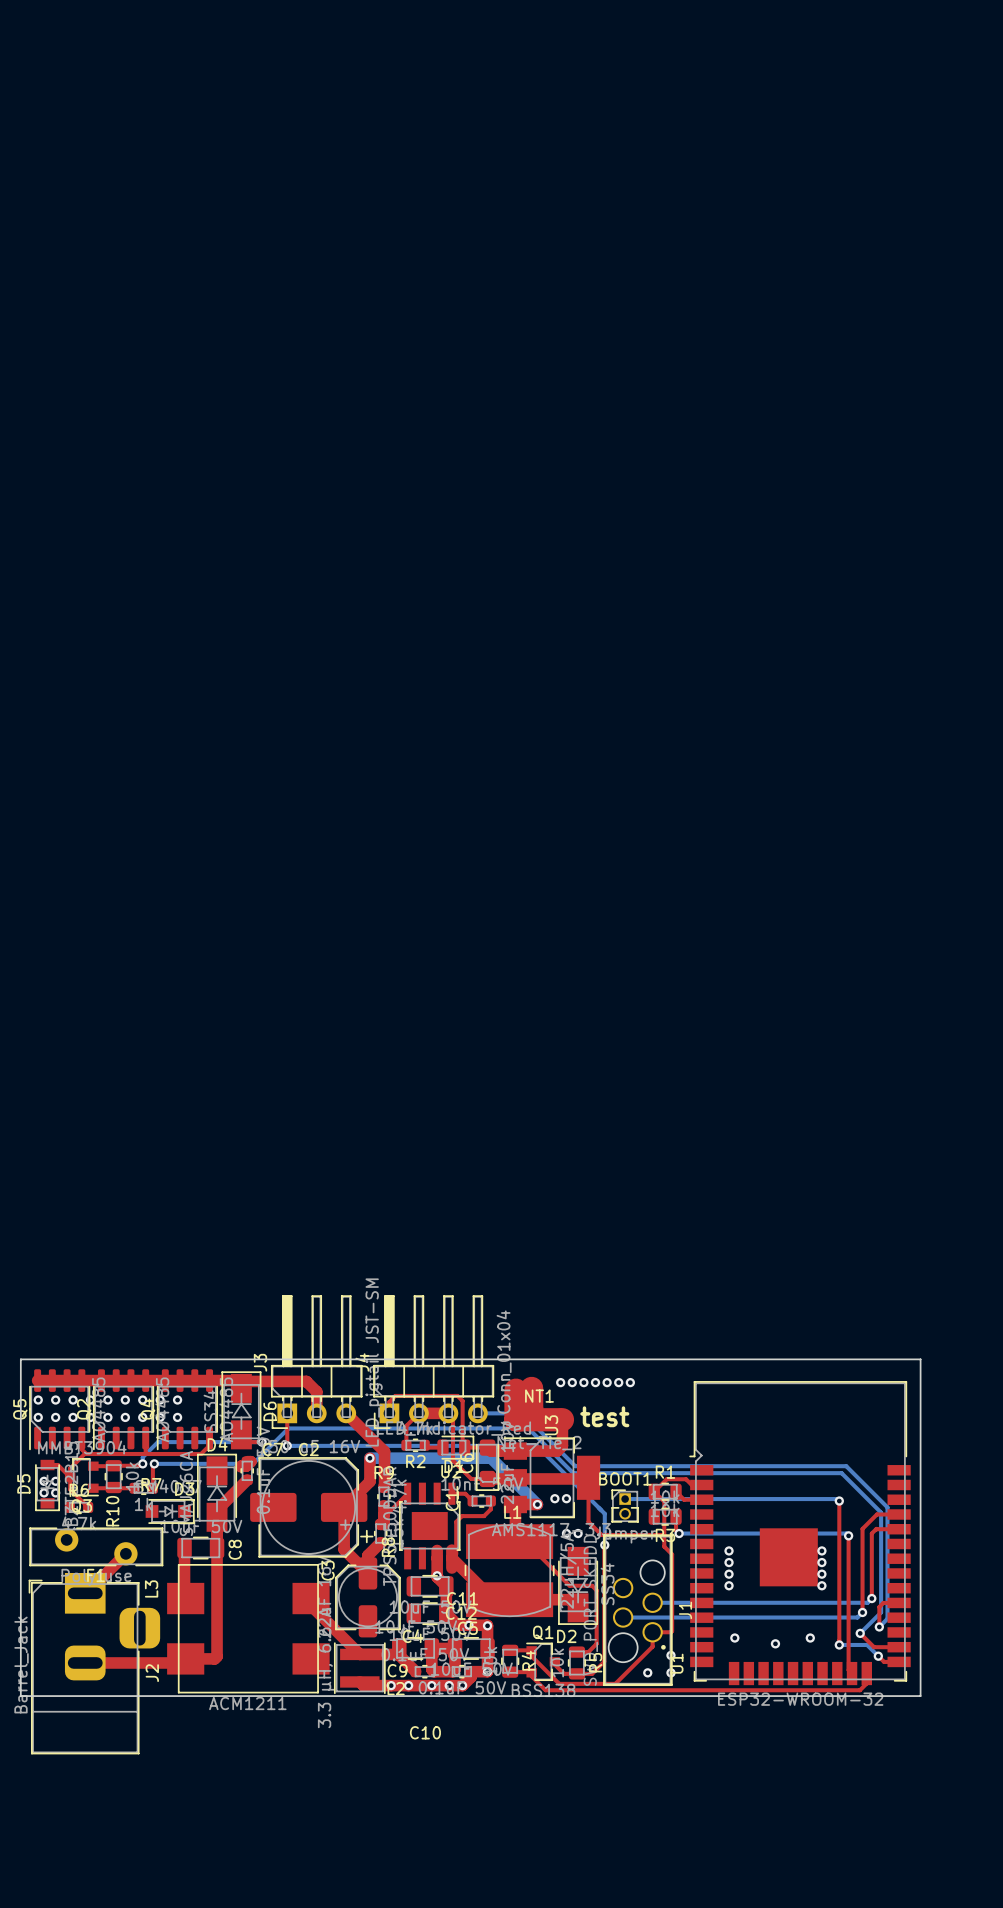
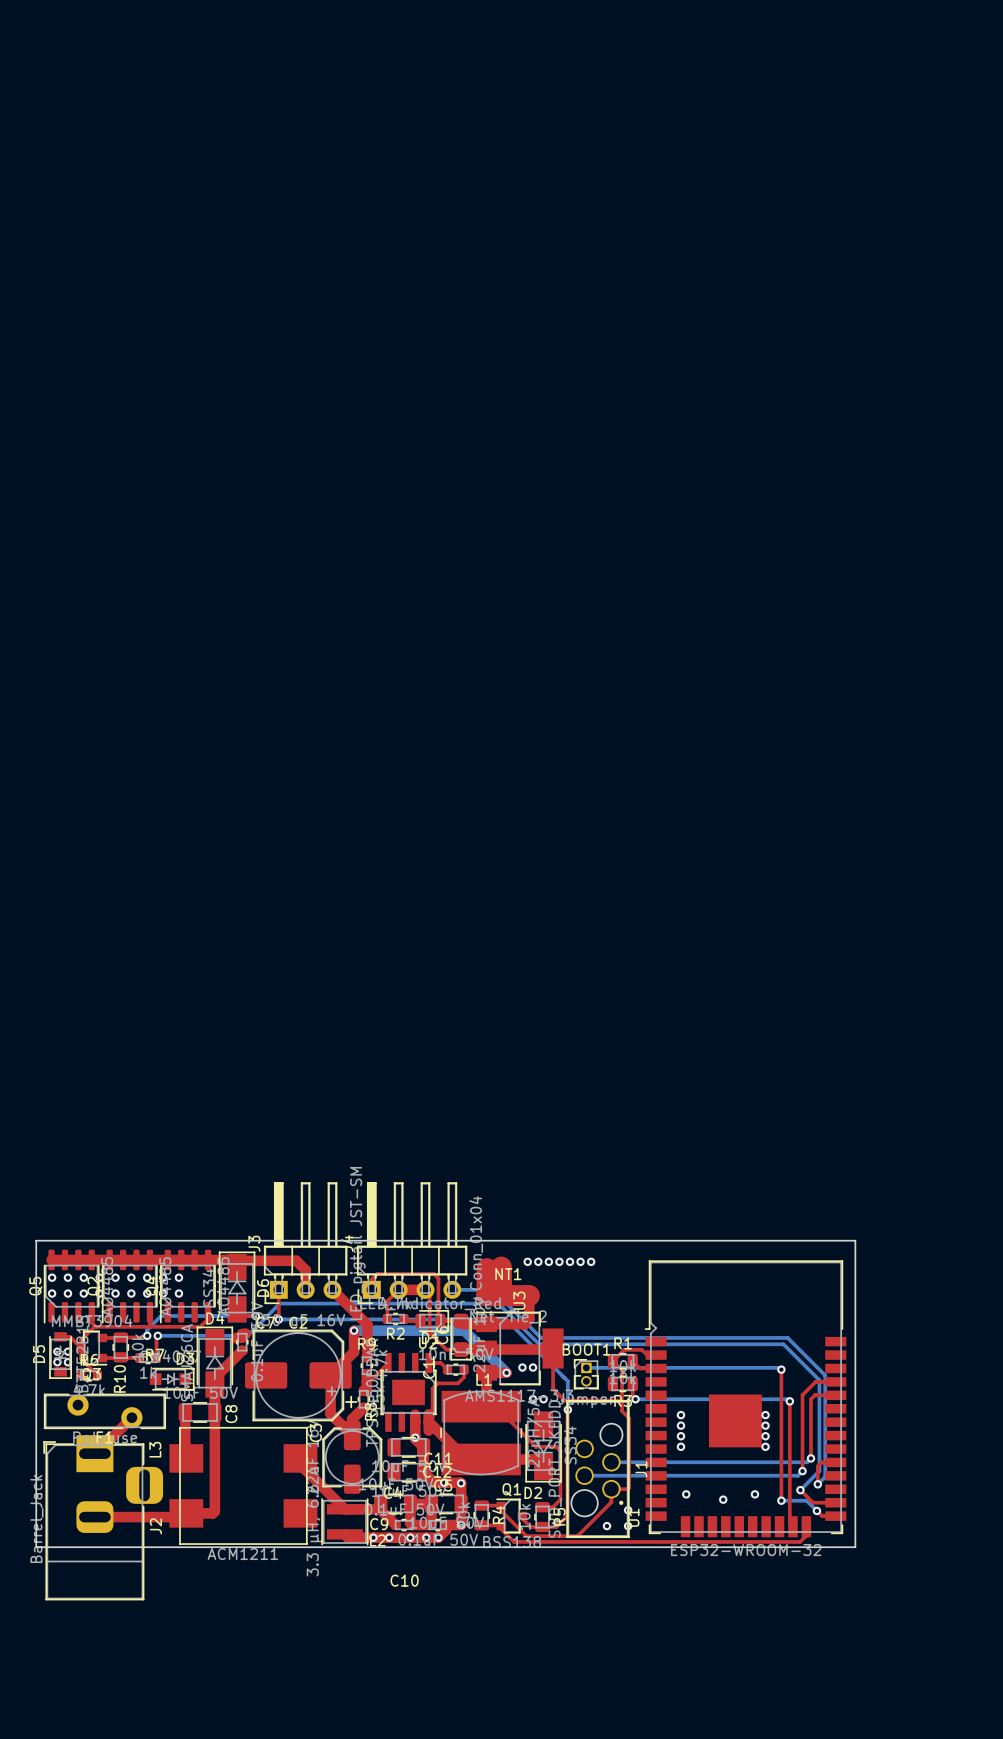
text: test (604, 1416) -> none

